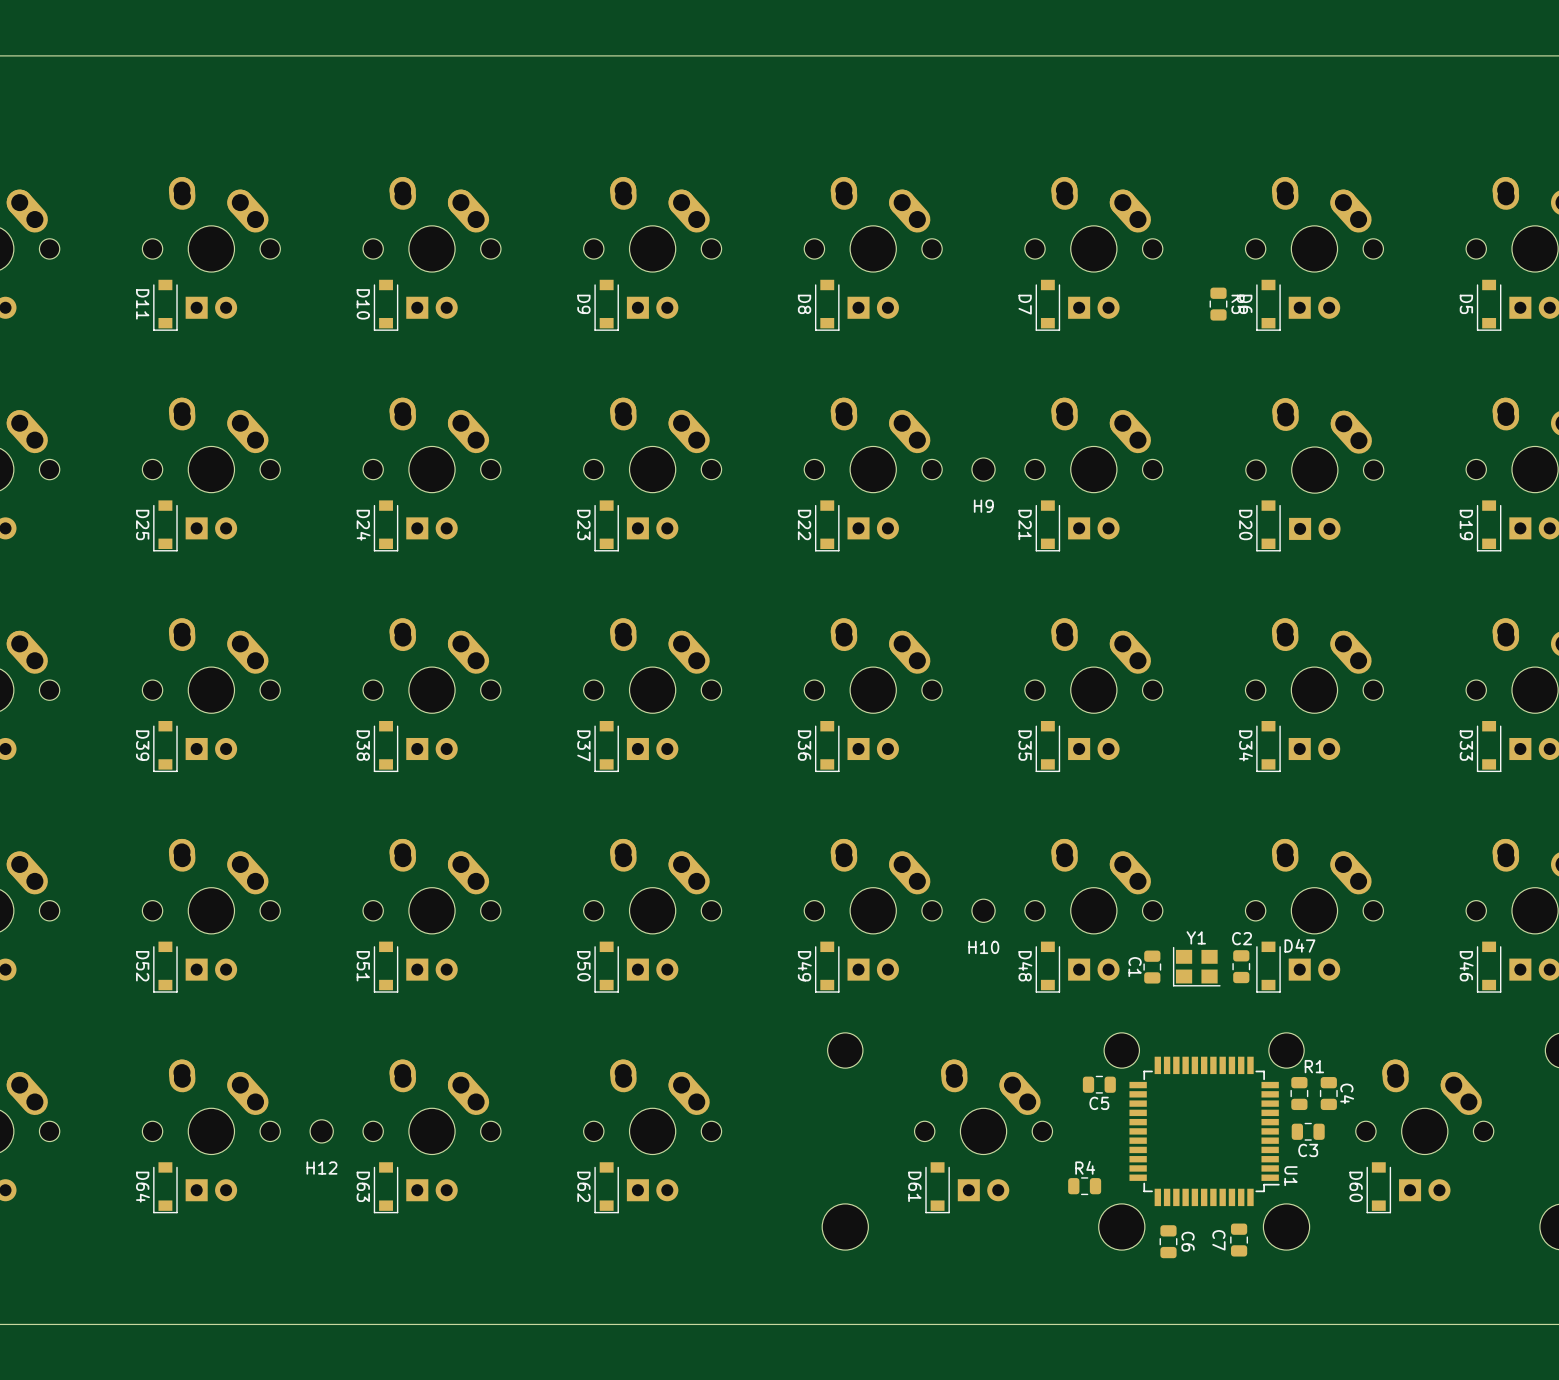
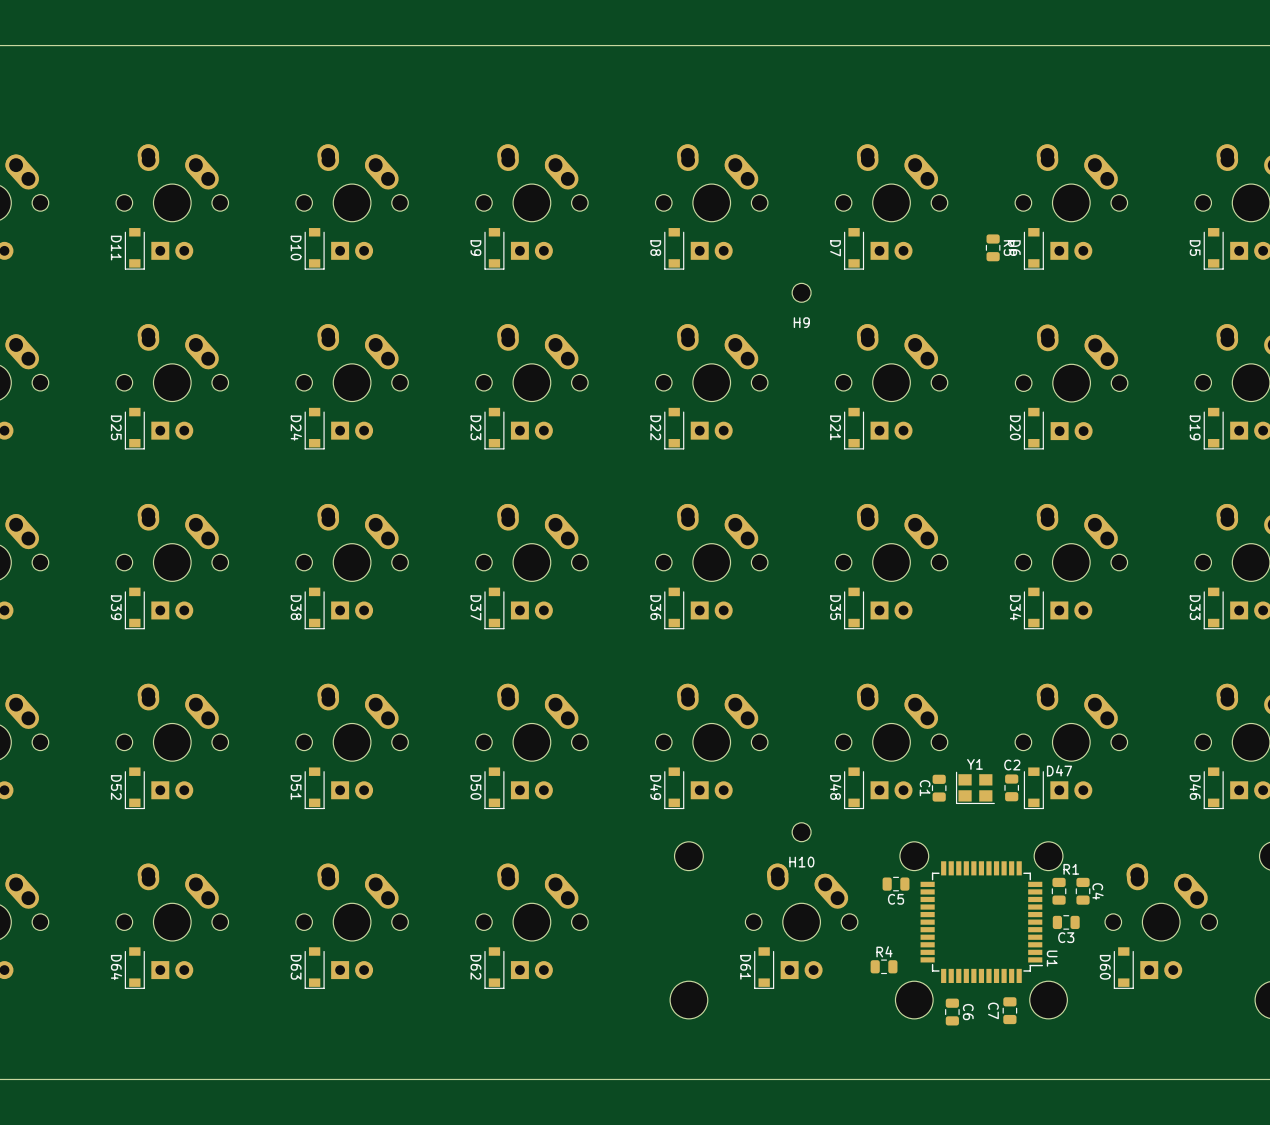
H9 position: (983, 469) -> (801, 292)
H10 position: (983, 910) -> (801, 832)
H12: (321, 1131) -> none

